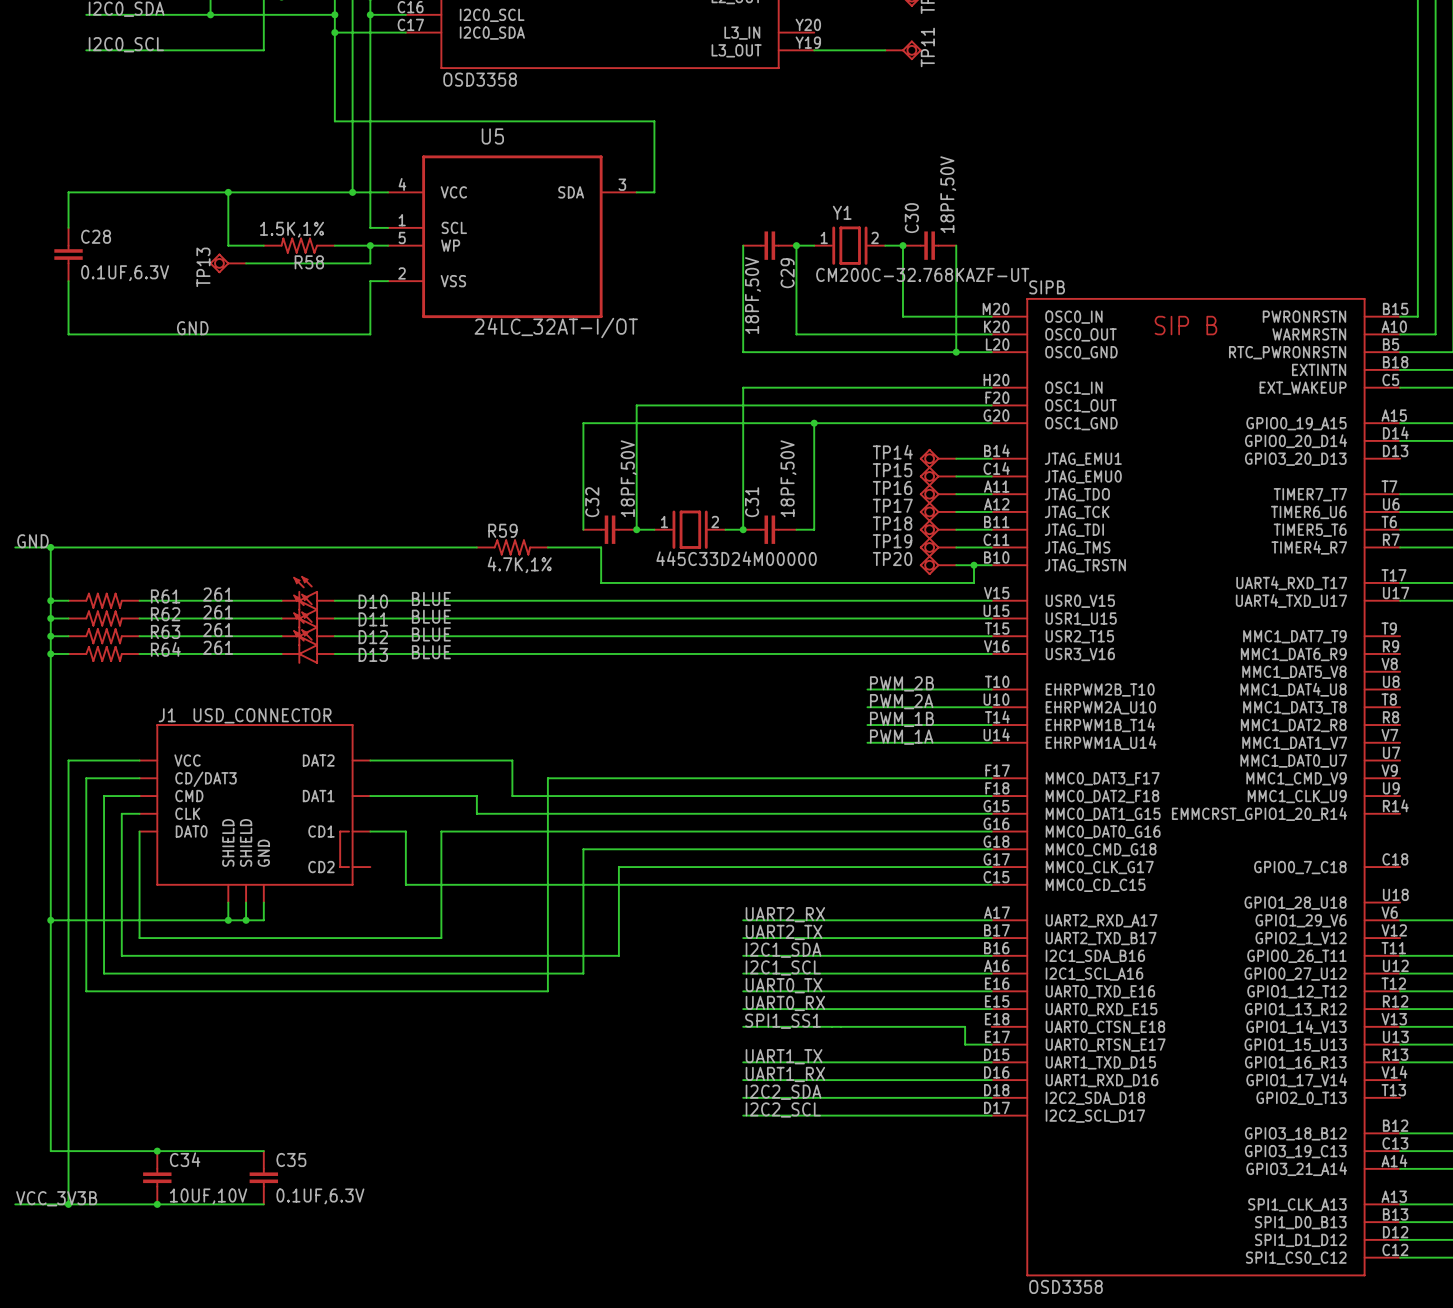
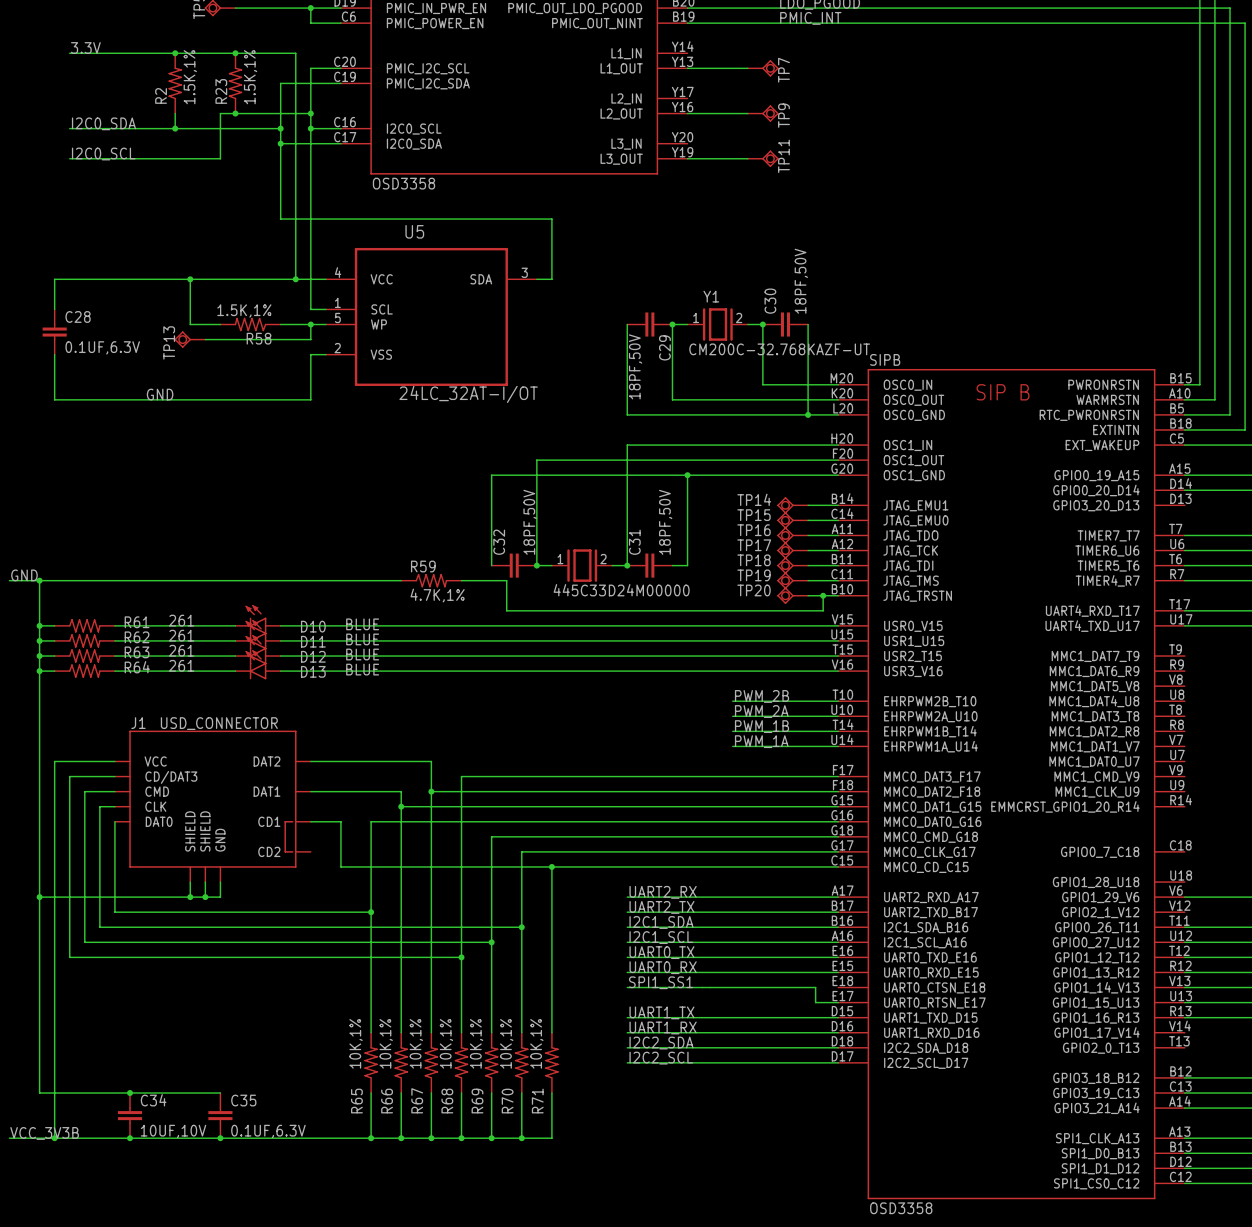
wire: none -> (431, 791) (431, 1032)
junction: none -> (431, 791)
wire: none -> (401, 806) (401, 1032)
junction: none -> (401, 806)
wire: none -> (551, 866) (551, 1032)
junction: none -> (551, 866)
wire: none -> (371, 912) (371, 1032)
junction: none -> (371, 912)
wire: none -> (521, 927) (521, 1032)
junction: none -> (521, 927)
wire: none -> (491, 942) (491, 1032)
junction: none -> (491, 942)
wire: none -> (461, 957) (461, 1032)
junction: none -> (461, 957)
R65: none -> 10K,1% (371, 1062)
R66: none -> 10K,1% (401, 1062)
R67: none -> 10K,1% (431, 1062)
R68: none -> 10K,1% (461, 1062)
R69: none -> 10K,1% (491, 1062)
R70: none -> 10K,1% (521, 1062)
R71: none -> 10K,1% (551, 1062)
wire: none -> (371, 1093) (371, 1138)
wire: none -> (401, 1093) (401, 1138)
wire: none -> (431, 1093) (431, 1138)
wire: none -> (461, 1093) (461, 1138)
wire: none -> (491, 1093) (491, 1138)
wire: none -> (521, 1093) (521, 1138)
wire: none -> (551, 1093) (551, 1138) (220, 1138)
junction: none -> (220, 1138)
junction: none -> (371, 1138)
junction: none -> (401, 1138)
junction: none -> (431, 1138)
junction: none -> (461, 1138)
junction: none -> (491, 1138)
junction: none -> (521, 1138)

